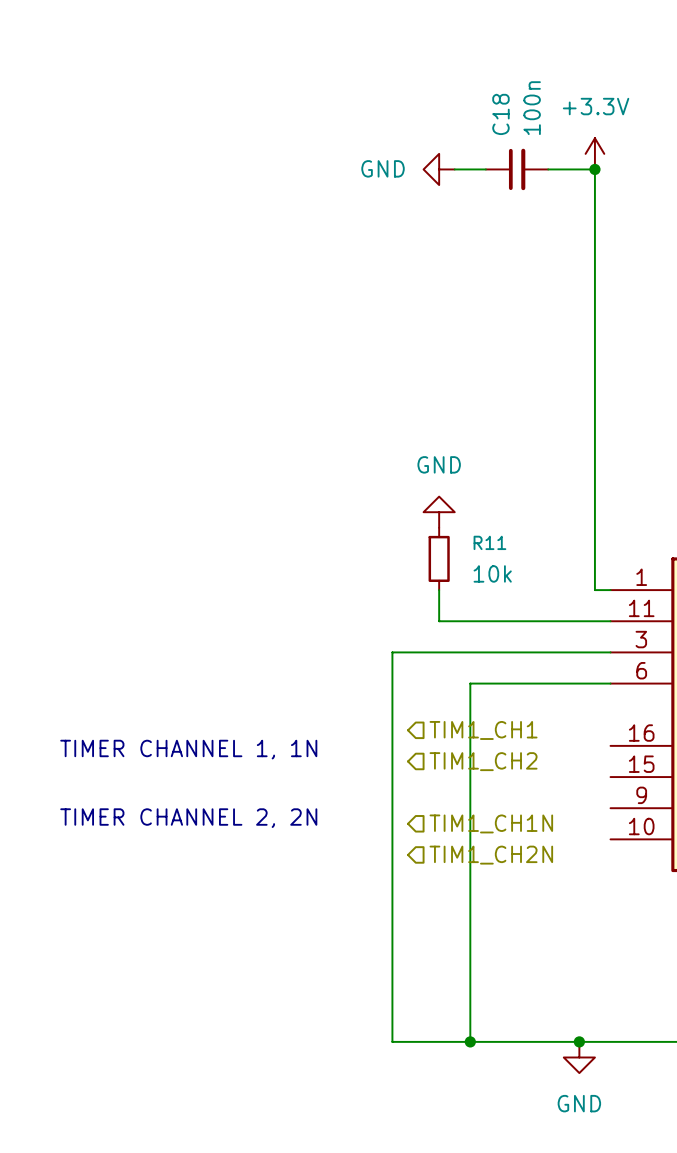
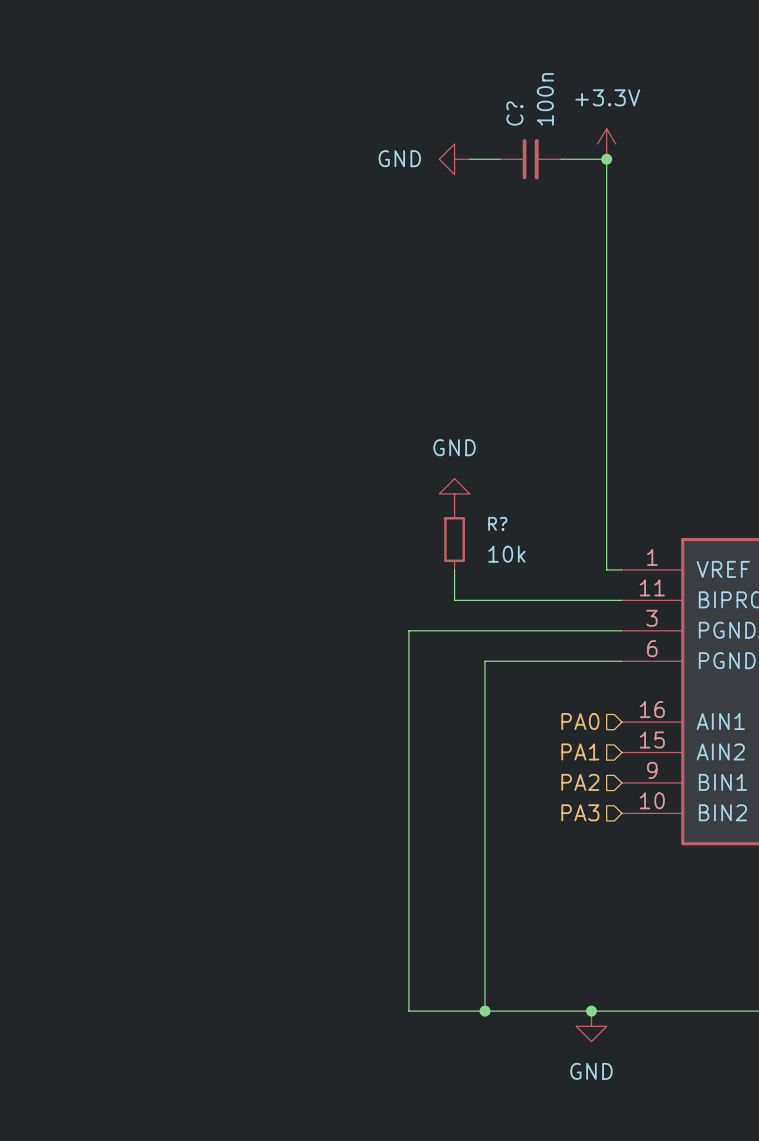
C18 name: C18 (500, 114) -> C? (514, 113)
R11 name: R11 (489, 542) -> R? (497, 523)
hierarchical label: TIM1_CH1 (483, 730) -> none
hierarchical label: none -> PA0 (580, 721)
text: TIMER CHANNEL 1, 1N (188, 749) -> none
hierarchical label: TIM1_CH2 (483, 761) -> none
hierarchical label: none -> PA1 (580, 751)
hierarchical label: none -> PA2 (580, 782)
text: TIMER CHANNEL 2, 2N (188, 818) -> none
hierarchical label: TIM1_CH1N (491, 823) -> none
hierarchical label: none -> PA3 (580, 812)
hierarchical label: TIM1_CH2N (491, 855) -> none

